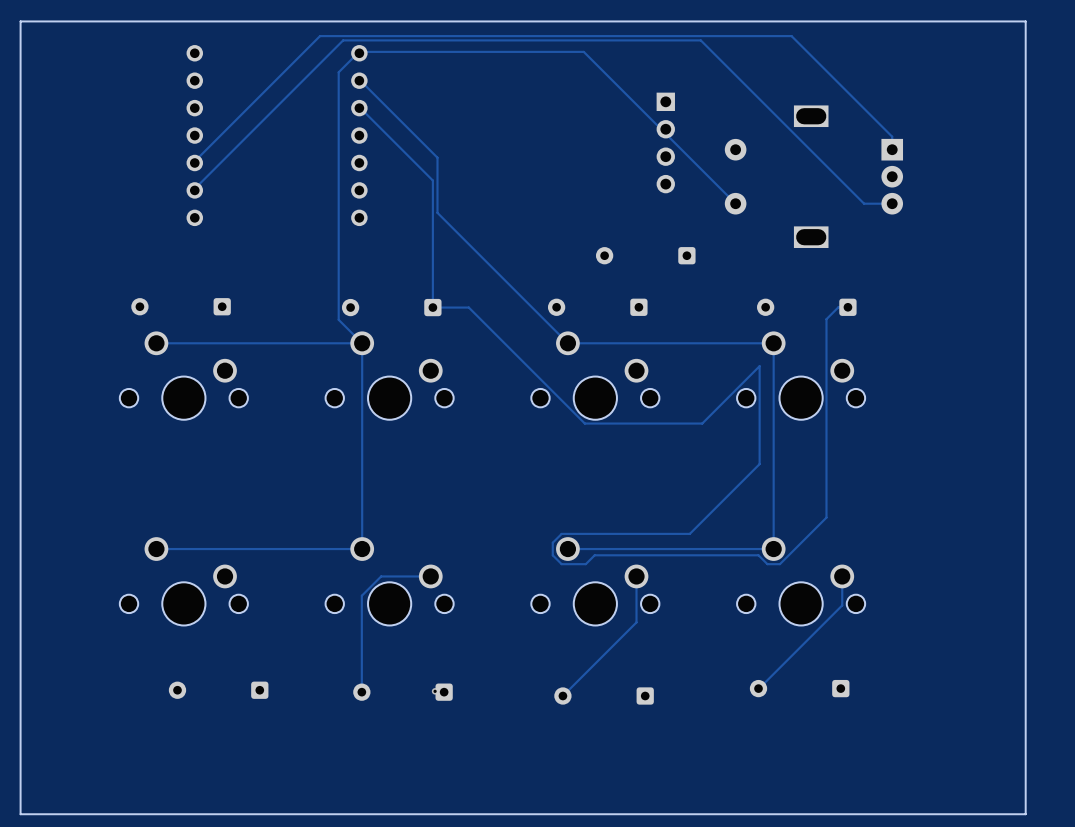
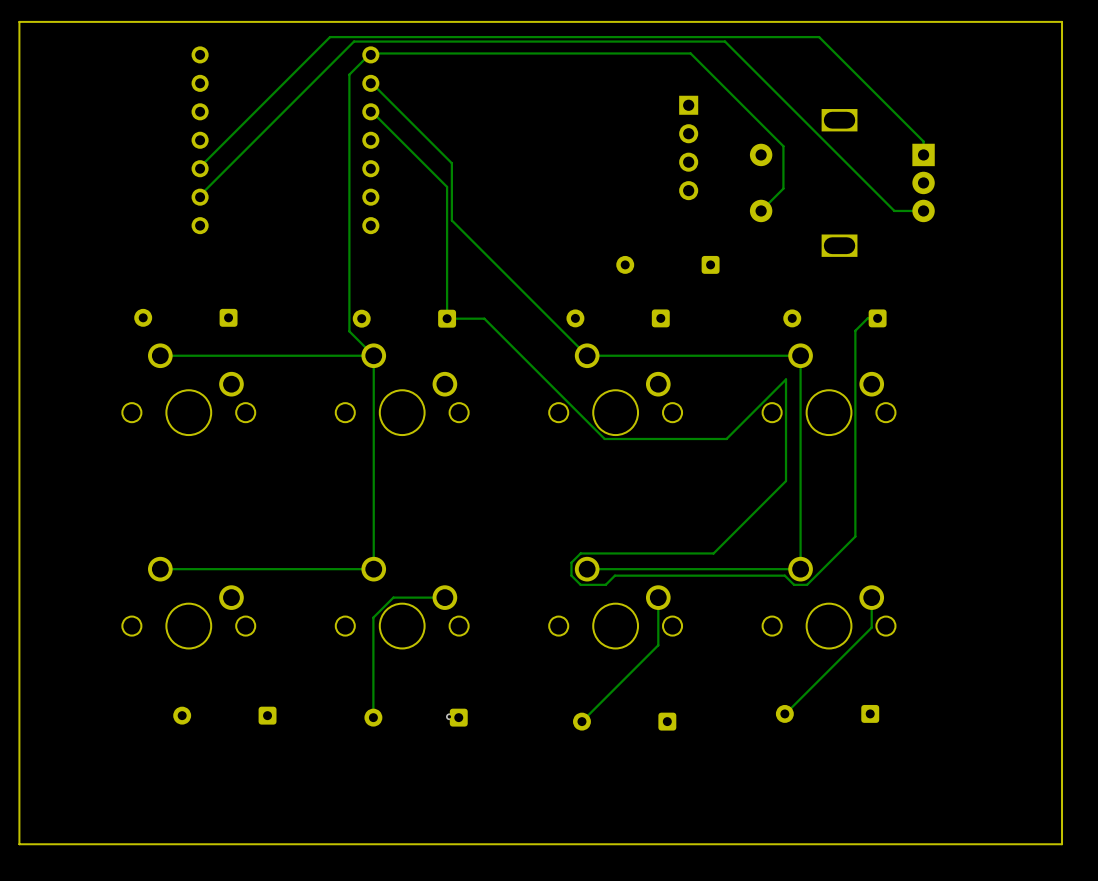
track: (583, 51) (735, 203) -> (603, 53) (690, 53) (783, 146) (783, 188) (761, 210)

